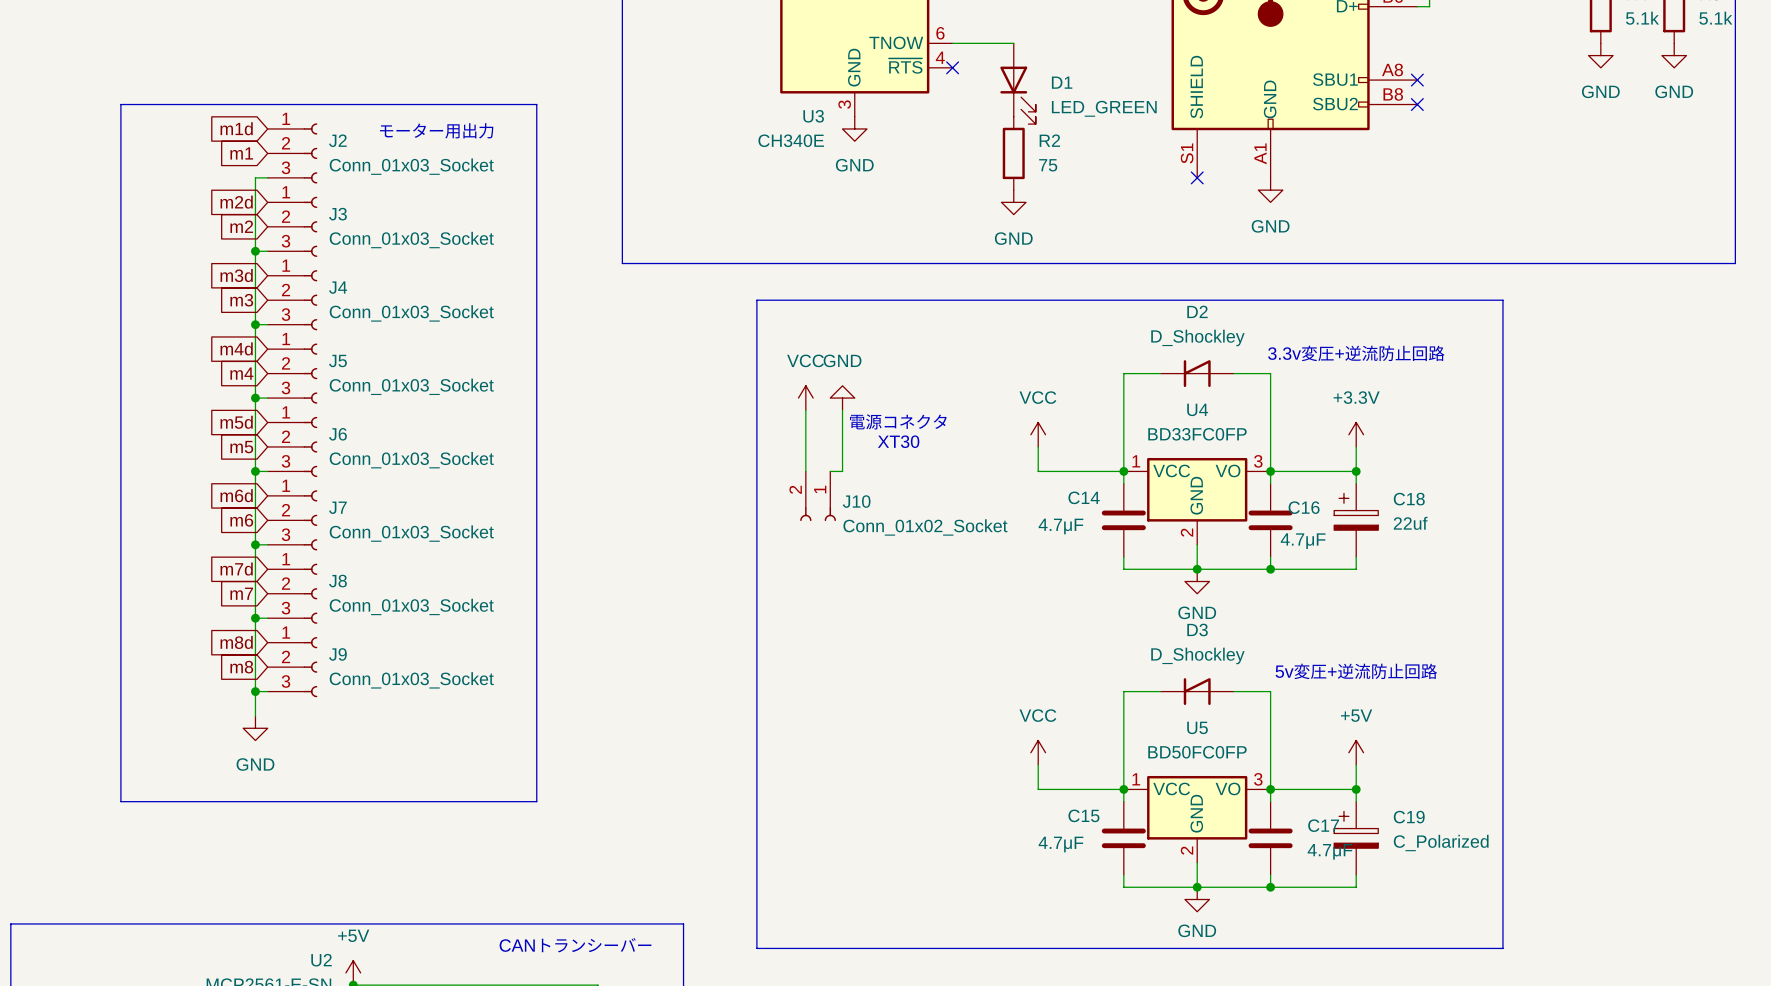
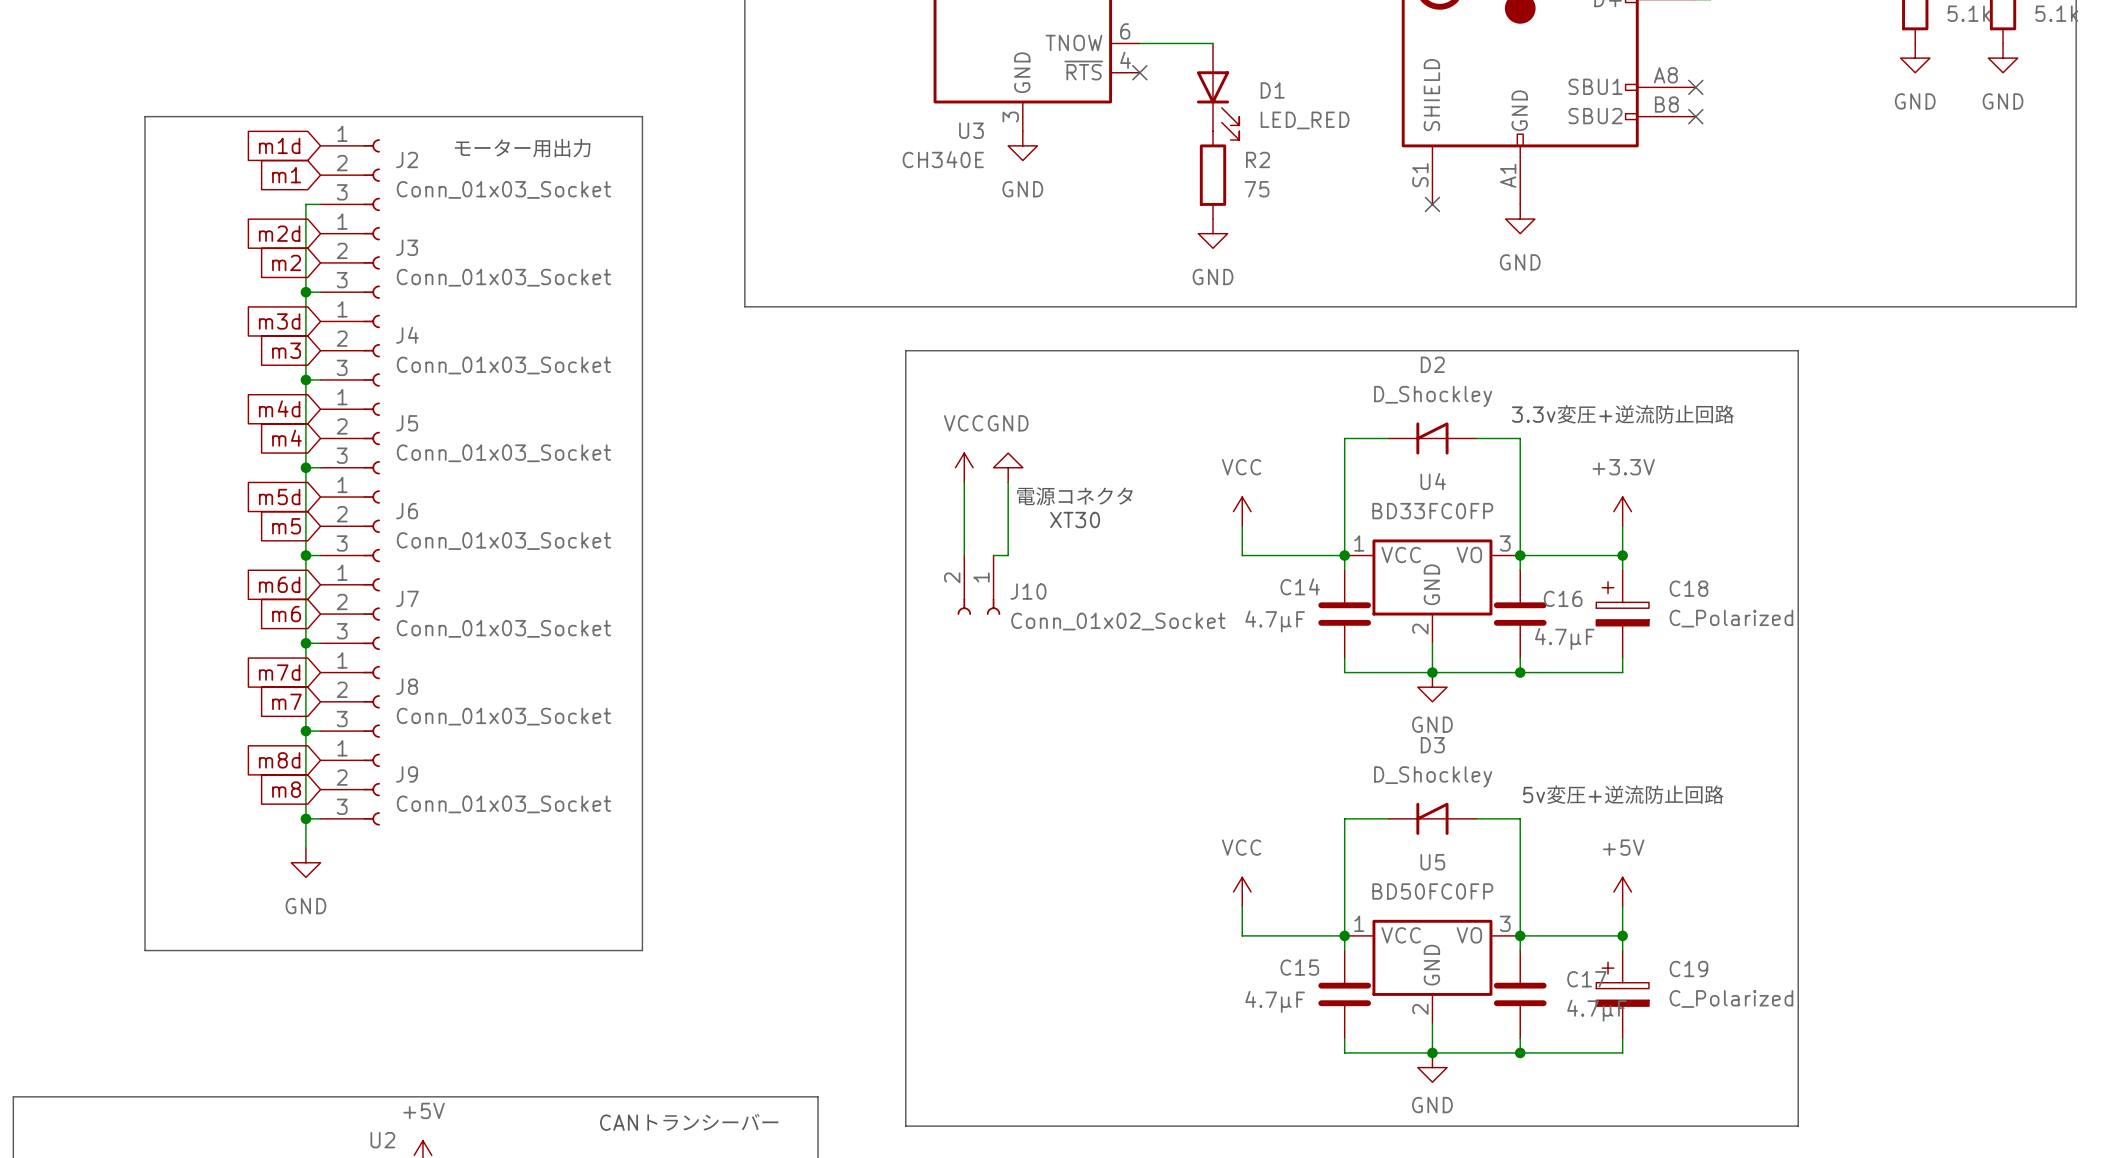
D1 value: LED_GREEN (1104, 108) -> LED_RED (1305, 120)
C18 value: 22uf (1410, 523) -> C_Polarized (1731, 618)

